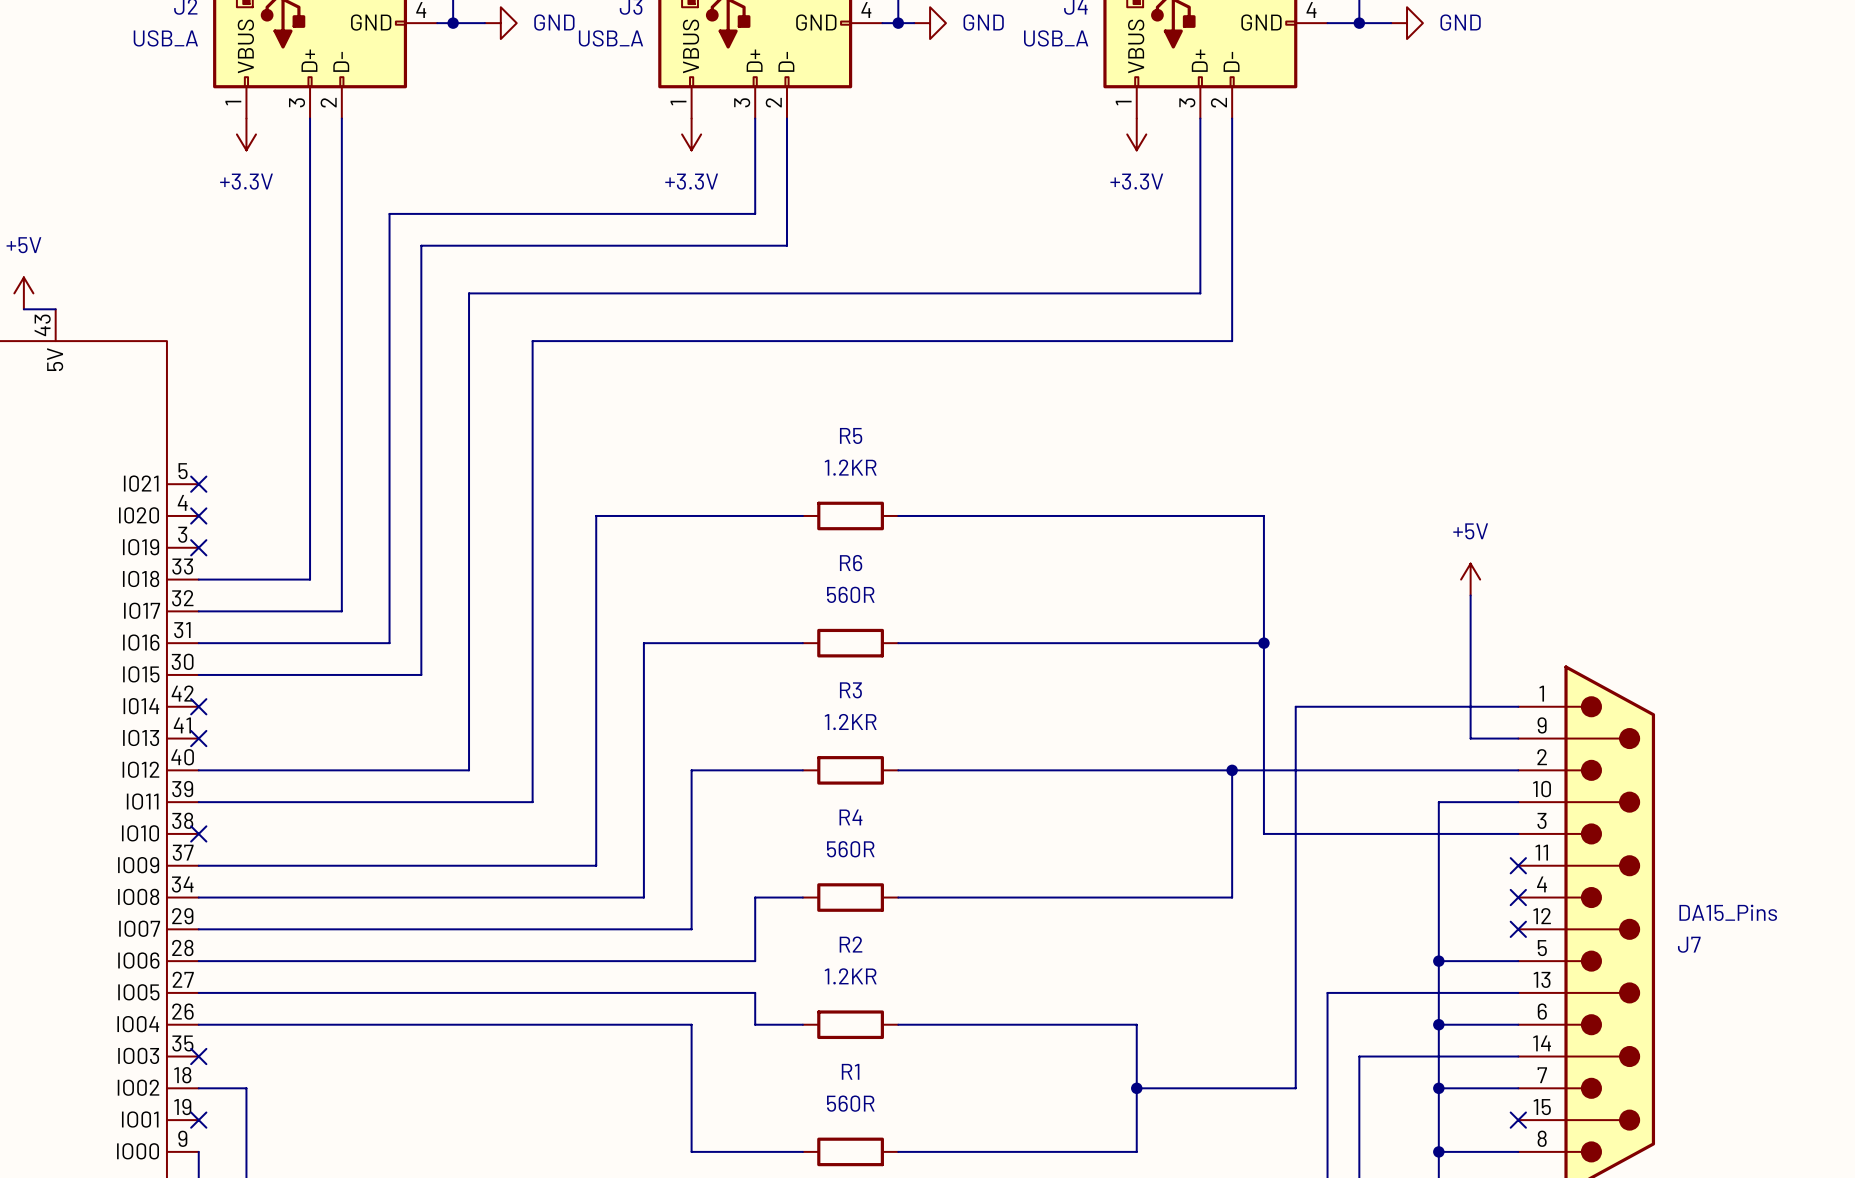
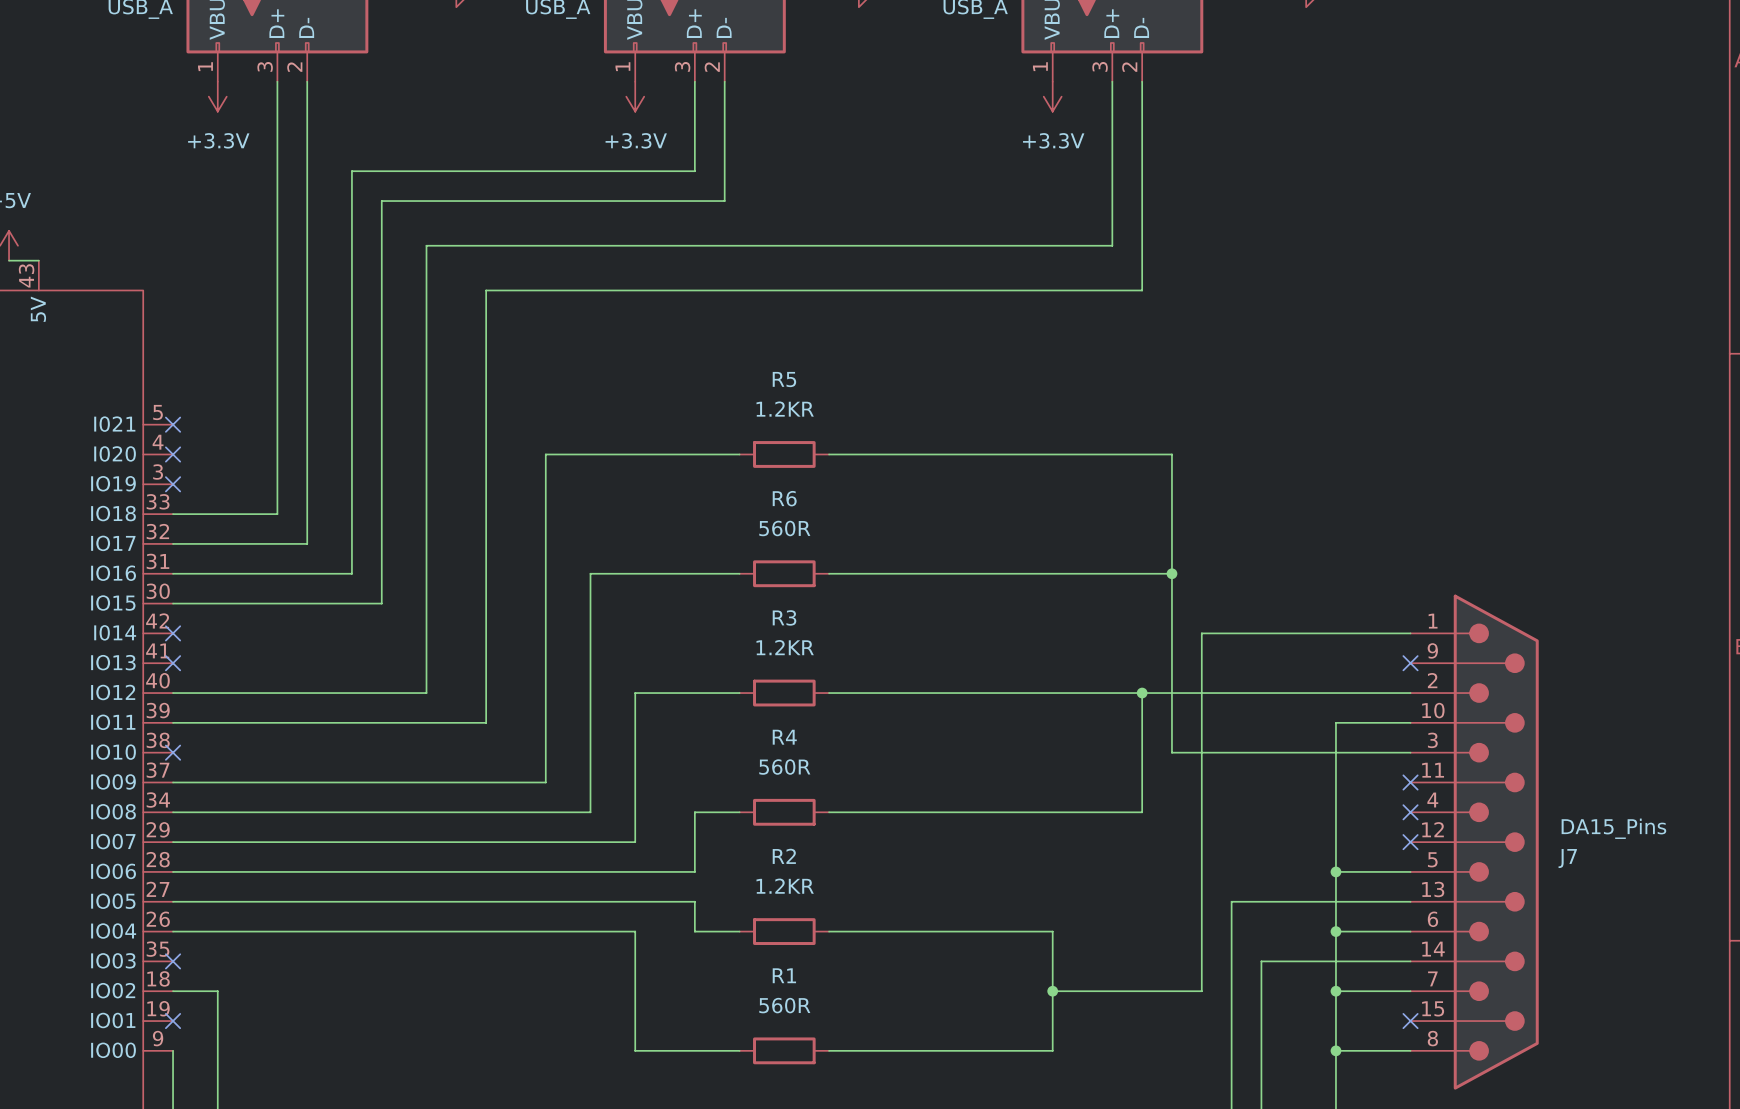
power symbol: +5V (1470, 579) -> none
wire: (1470, 595) (1470, 738) (1518, 738) -> none
no-connect mark: none -> (1410, 663)

